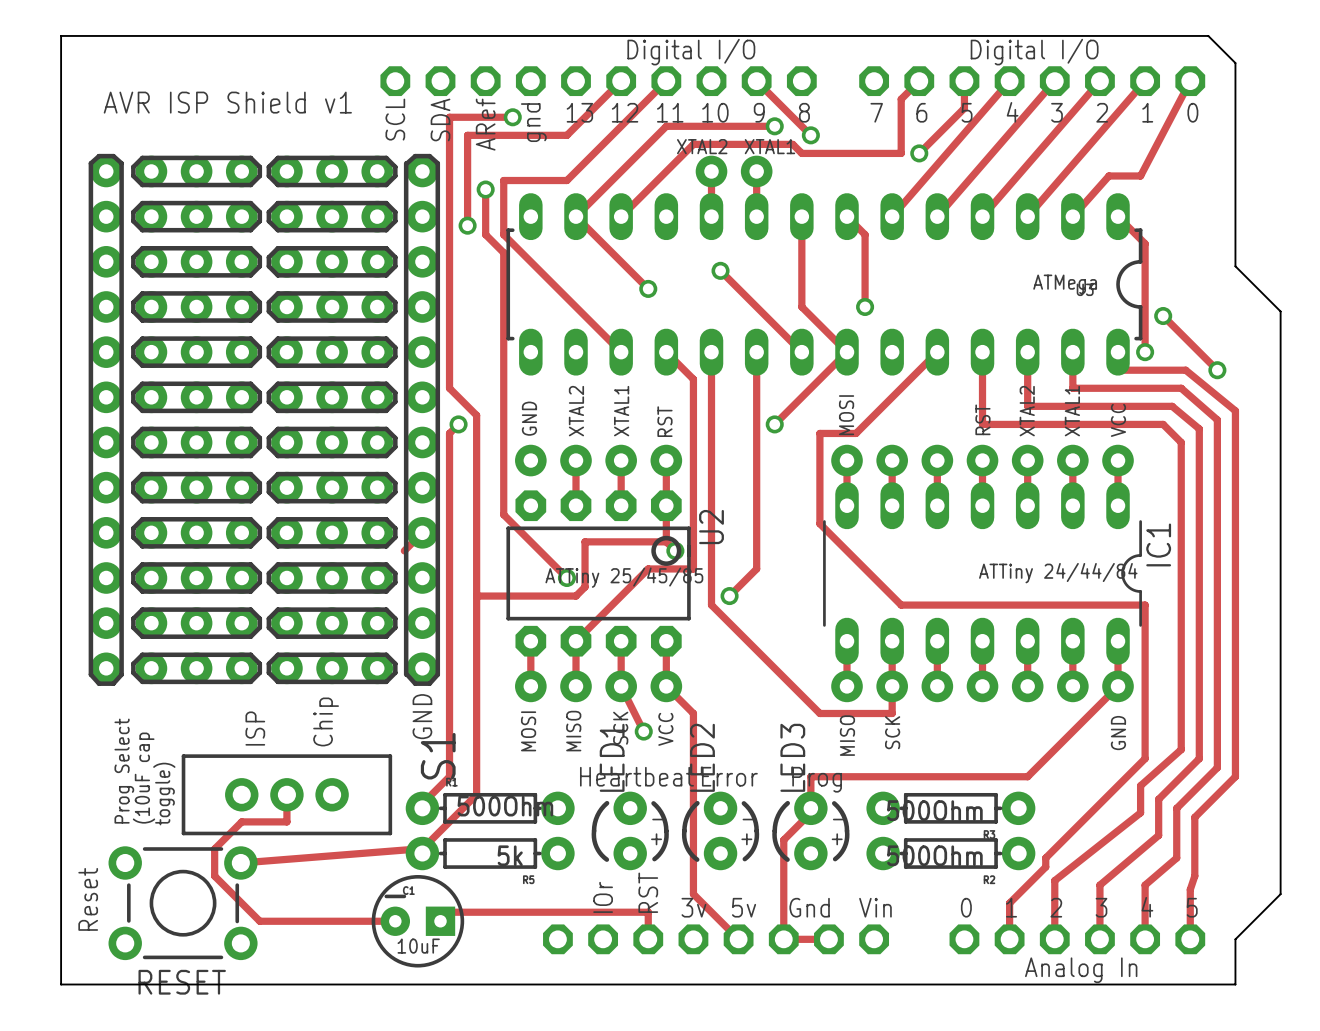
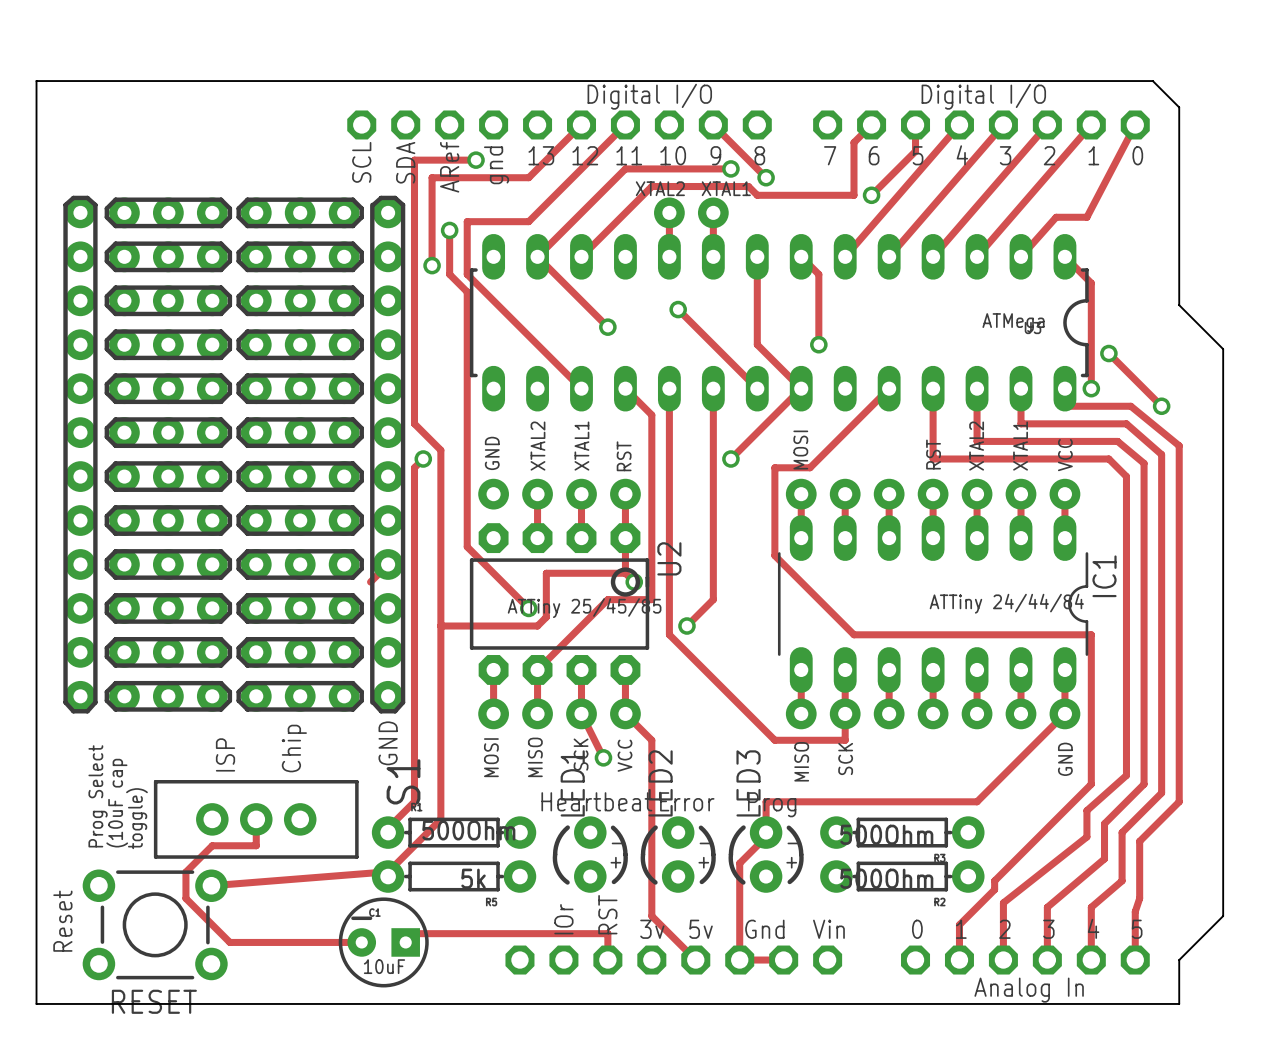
text: AVR ISP Shield v1 (227, 102) -> none

